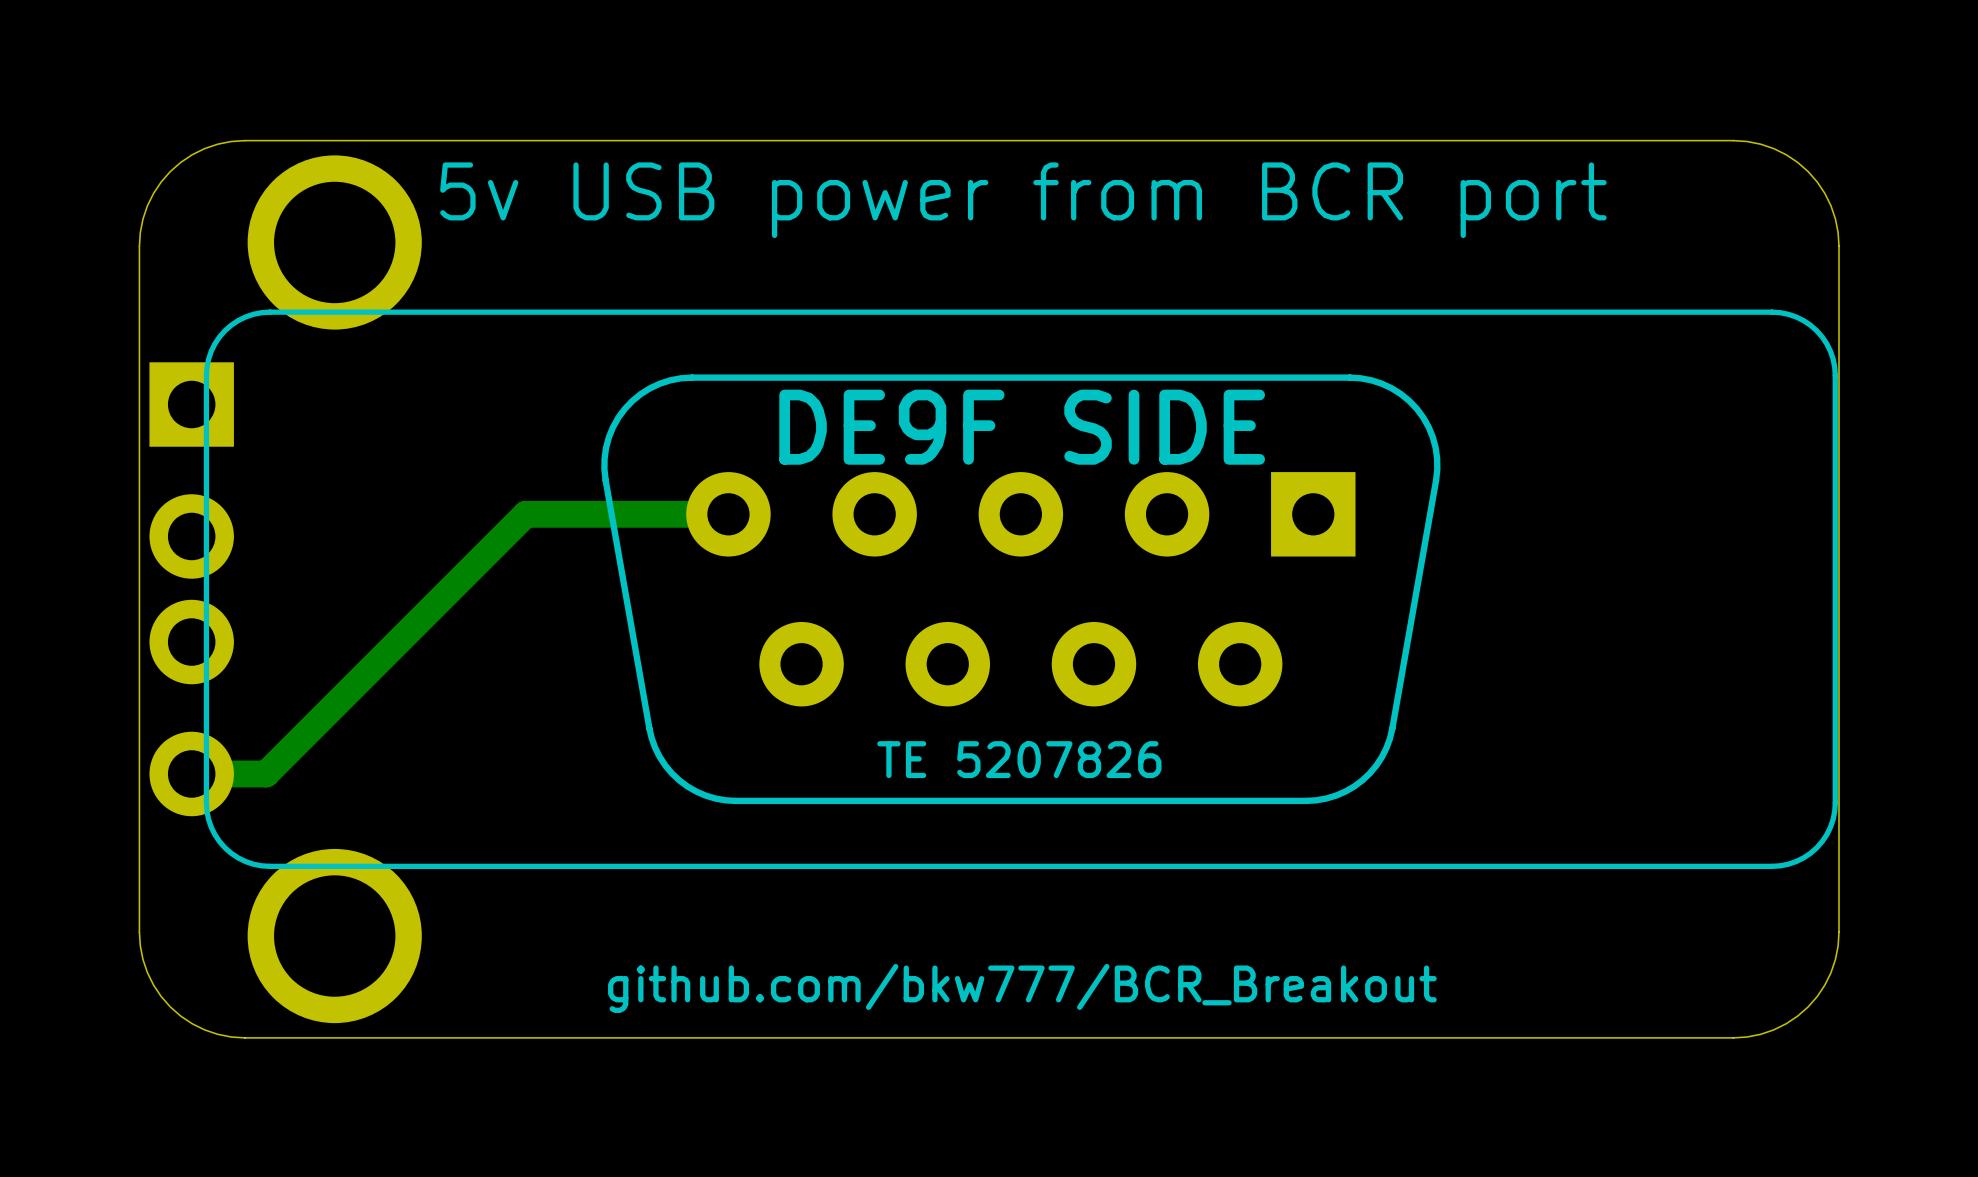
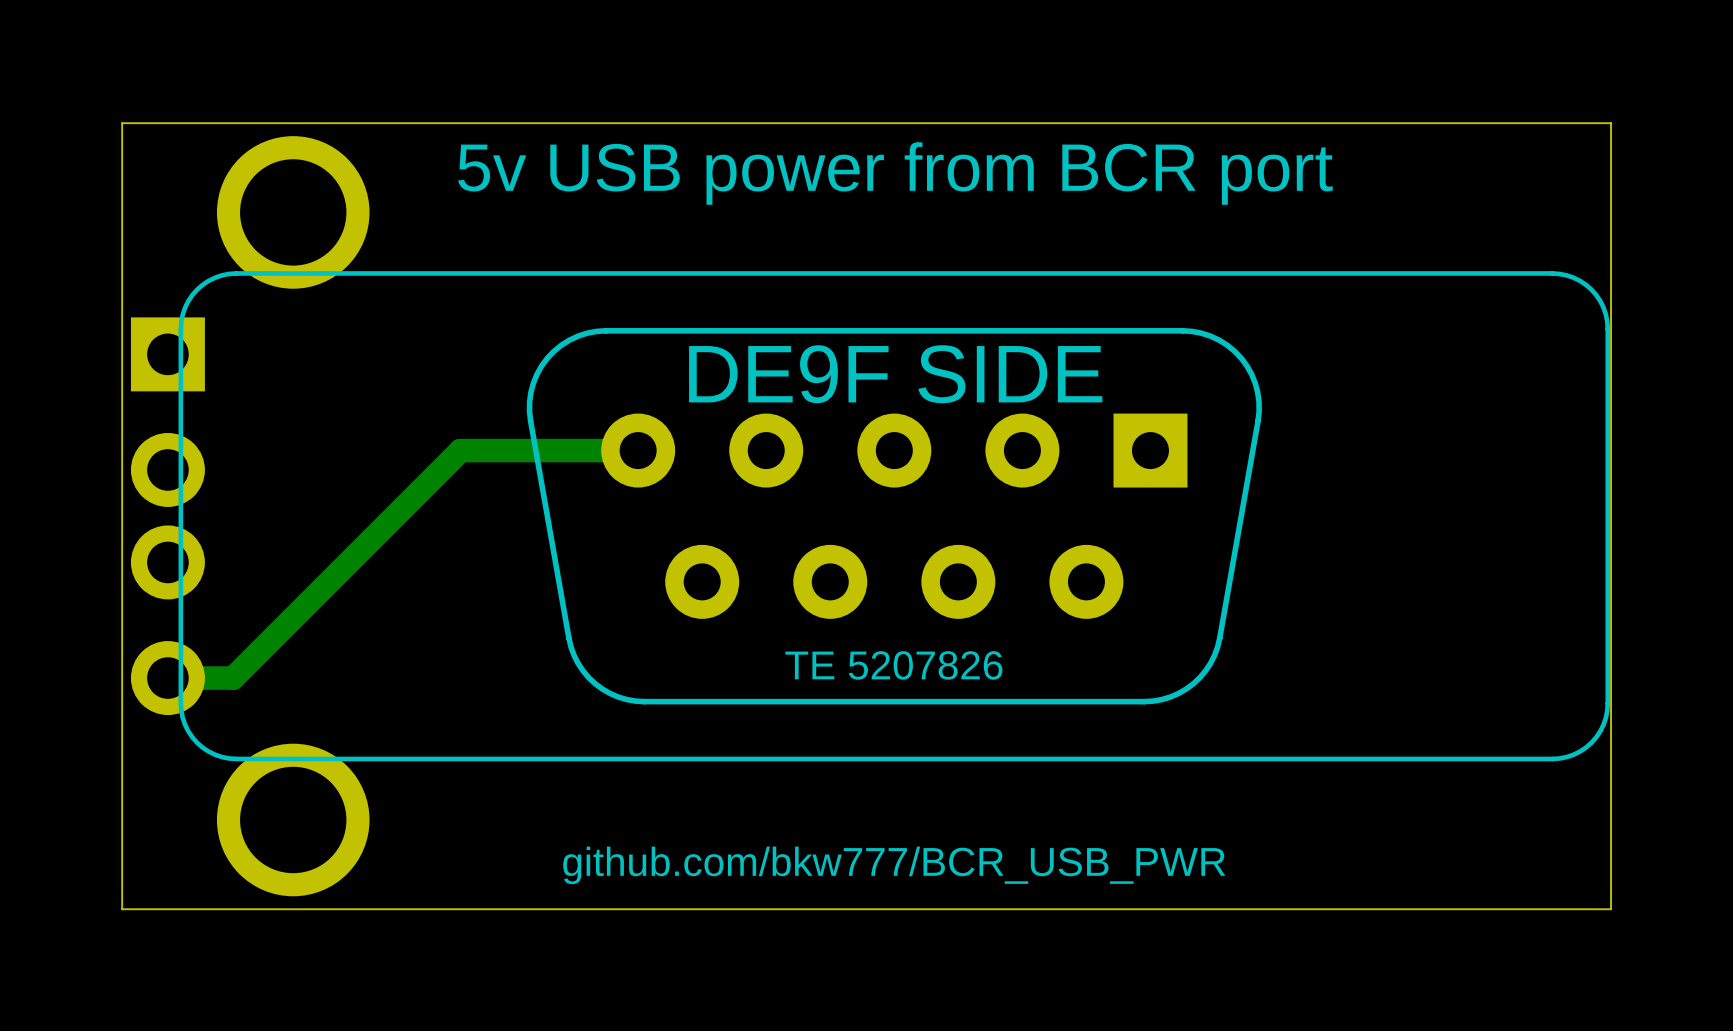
board edge: (245, 140) (217, 144) (204, 148) (192, 154) (170, 171) (161, 181) (147, 205) (140, 232) (139, 246) -> (214, 123) (122, 123) (122, 215)
board edge: (1733, 140) (1760, 144) (1773, 148) (1786, 154) (1808, 171) (1824, 193) (1830, 205) (1835, 218) (1839, 246) -> (1518, 123) (1611, 123) (1611, 215)
board edge: (139, 932) (140, 946) (147, 972) (161, 996) (170, 1006) (192, 1023) (204, 1029) (217, 1034) (245, 1037) -> (122, 816) (122, 909) (214, 909)
board edge: (1839, 932) (1835, 959) (1830, 972) (1824, 985) (1808, 1006) (1786, 1023) (1773, 1029) (1760, 1034) (1733, 1037) -> (1611, 816) (1611, 909) (1518, 909)
text: github.com/bkw777/BCR_Breakout (1022, 988) -> github.com/bkw777/BCR_USB_PWR (894, 865)

